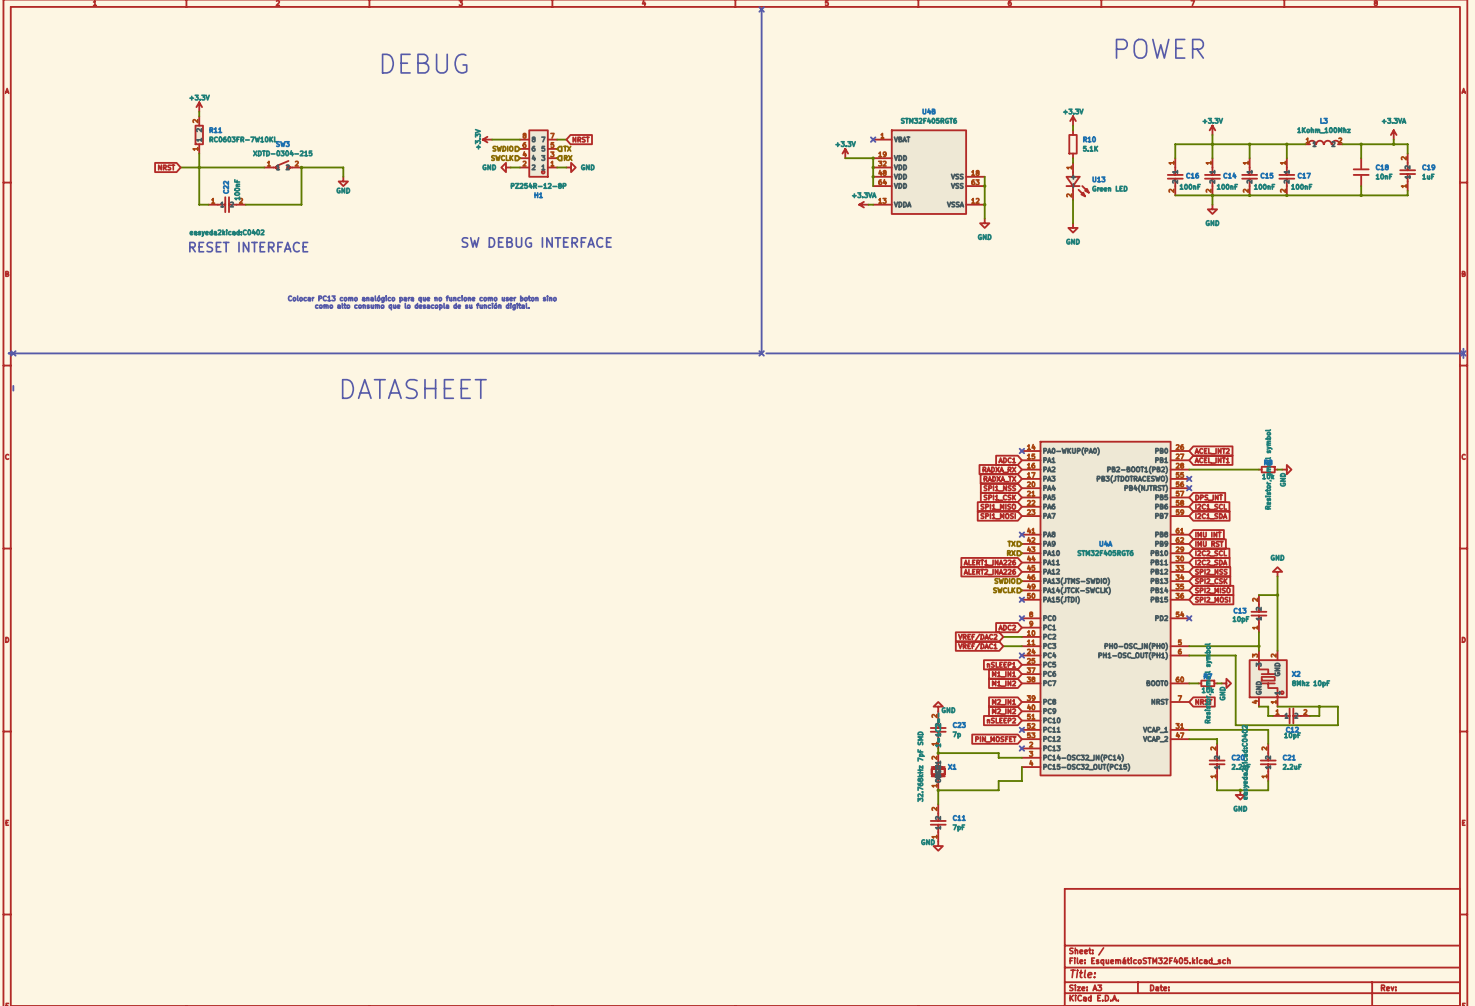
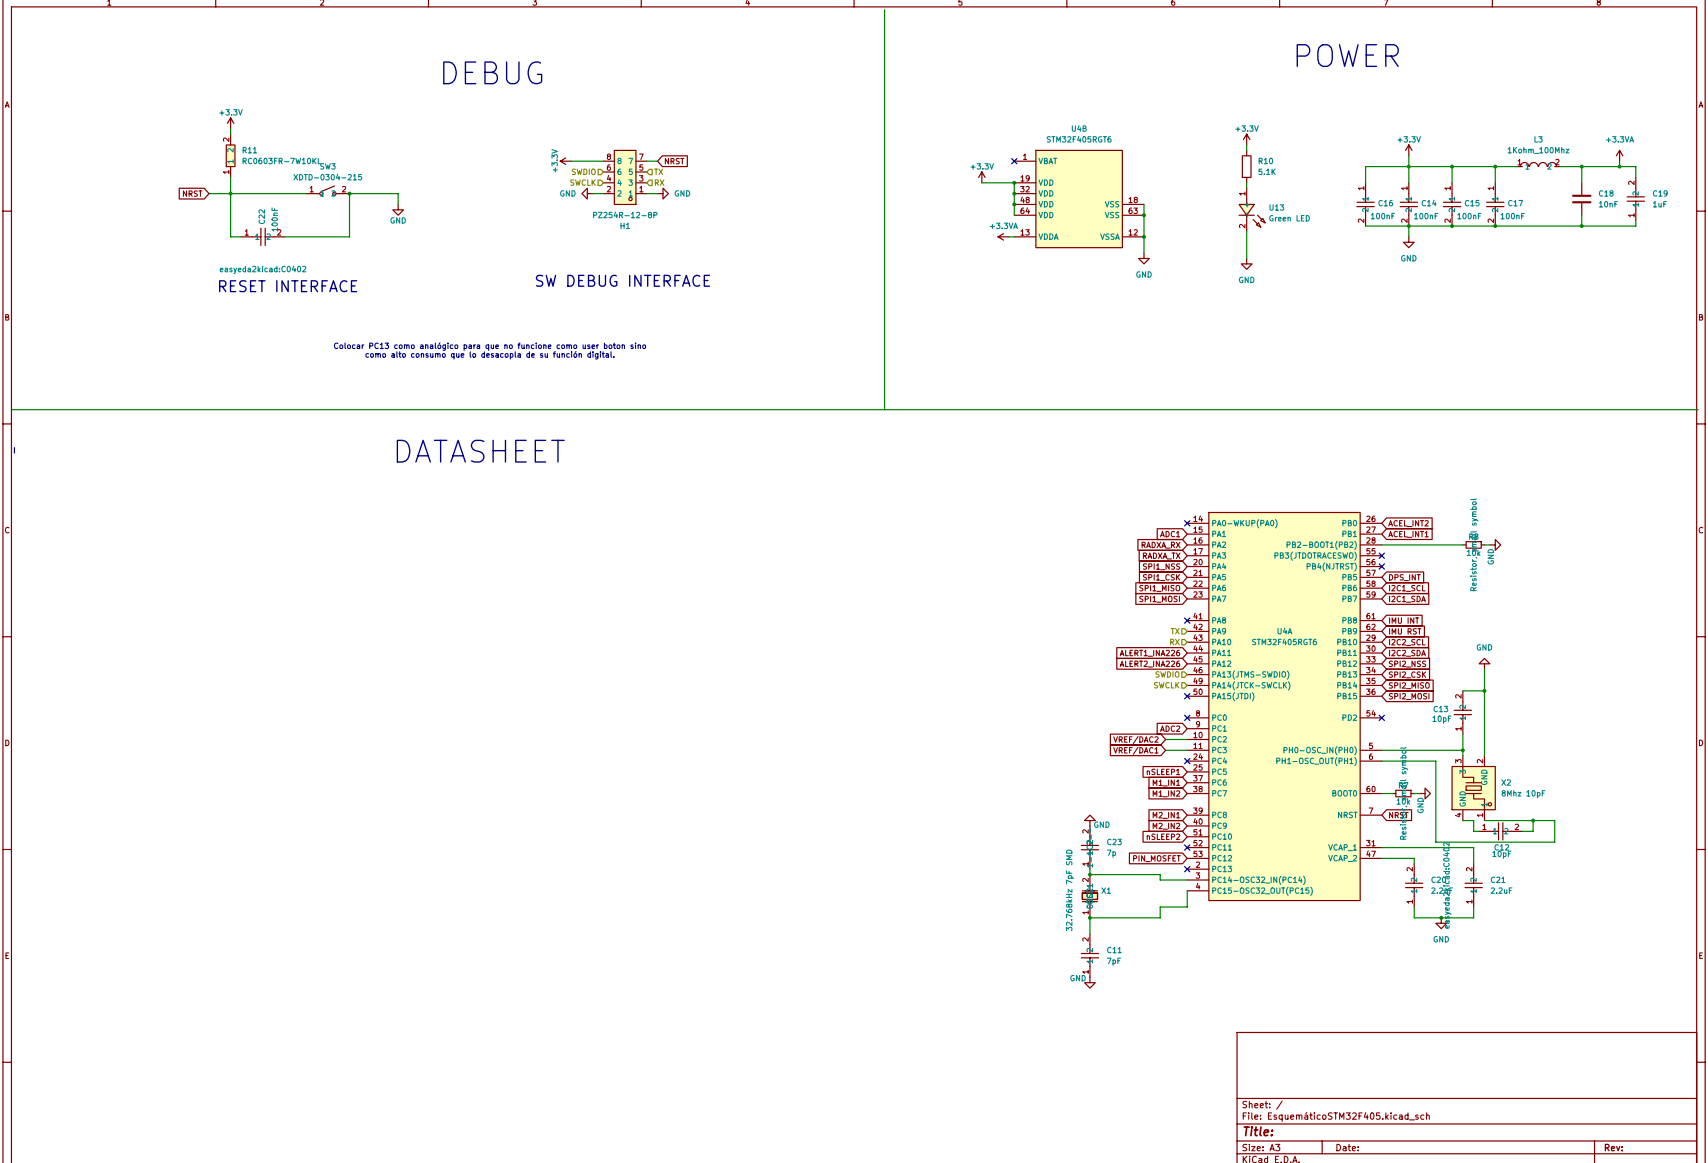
line: (761, 9) (761, 353) (8, 353) -> none
no-connect mark: (761, 9) -> none
line: (1463, 348) (1463, 358) -> none
no-connect mark: (13, 353) -> none
no-connect mark: (761, 353) -> none
line: (766, 353) (1463, 353) -> none
no-connect mark: (1463, 353) -> none

